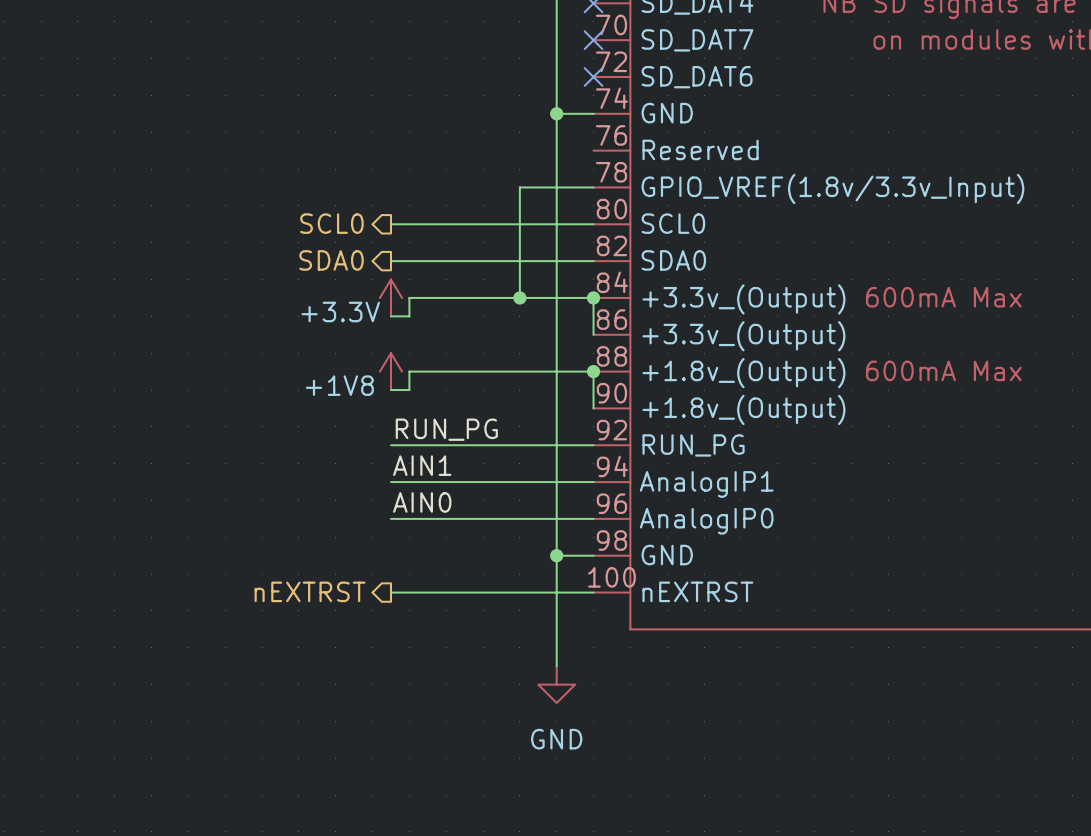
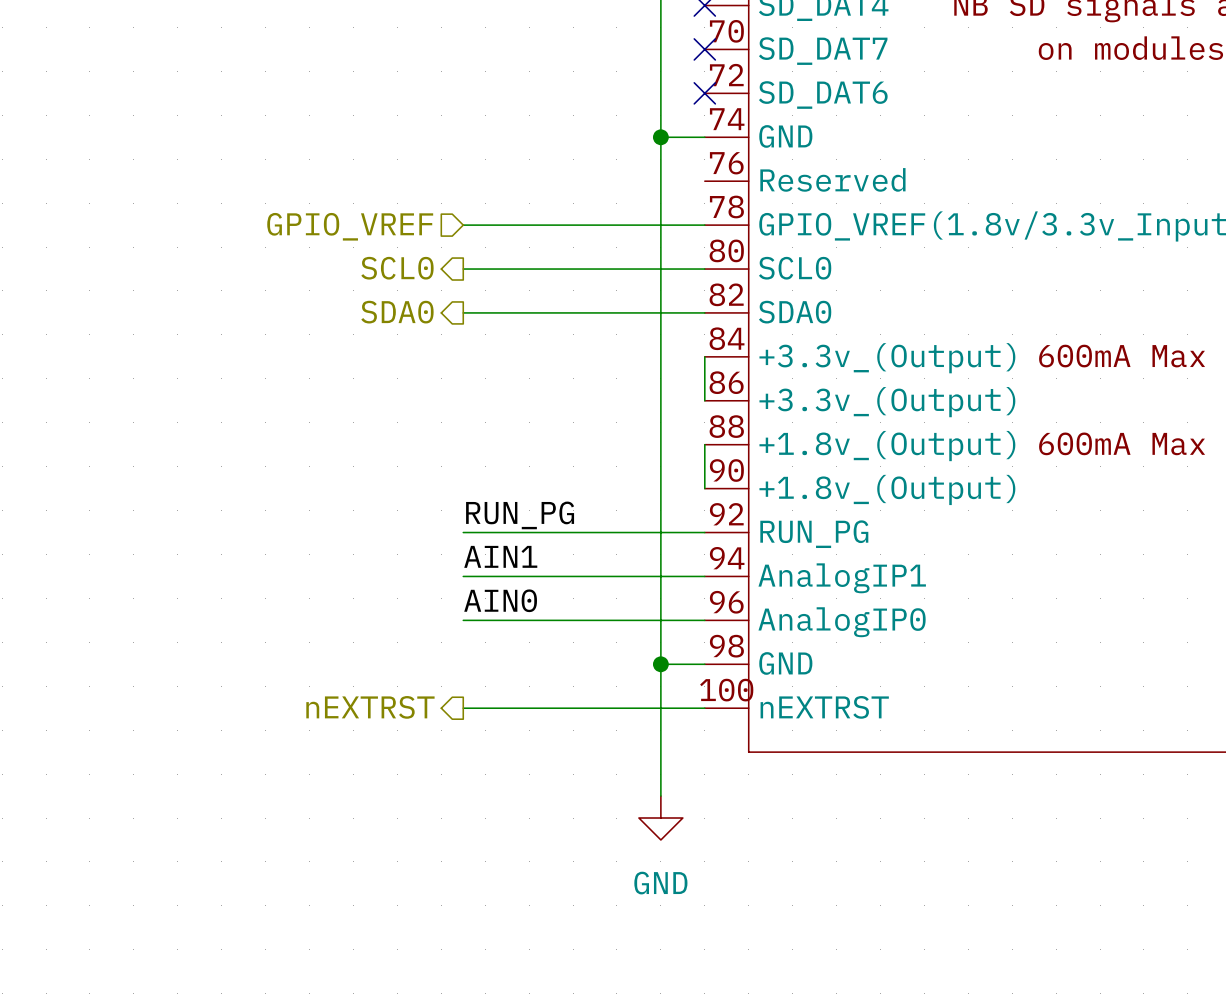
hierarchical label: none -> GPIO_VREF (350, 226)
wire: (519, 187) (519, 297) -> (616, 225) (463, 225)
power symbol: +3.3V (390, 297) -> none
junction: (519, 297) -> none
wire: (593, 297) (409, 297) (409, 316) (390, 316) -> none
junction: (593, 297) -> none
power symbol: +1V8 (390, 371) -> none
wire: (593, 371) (409, 371) (409, 390) (390, 390) -> none
junction: (593, 371) -> none

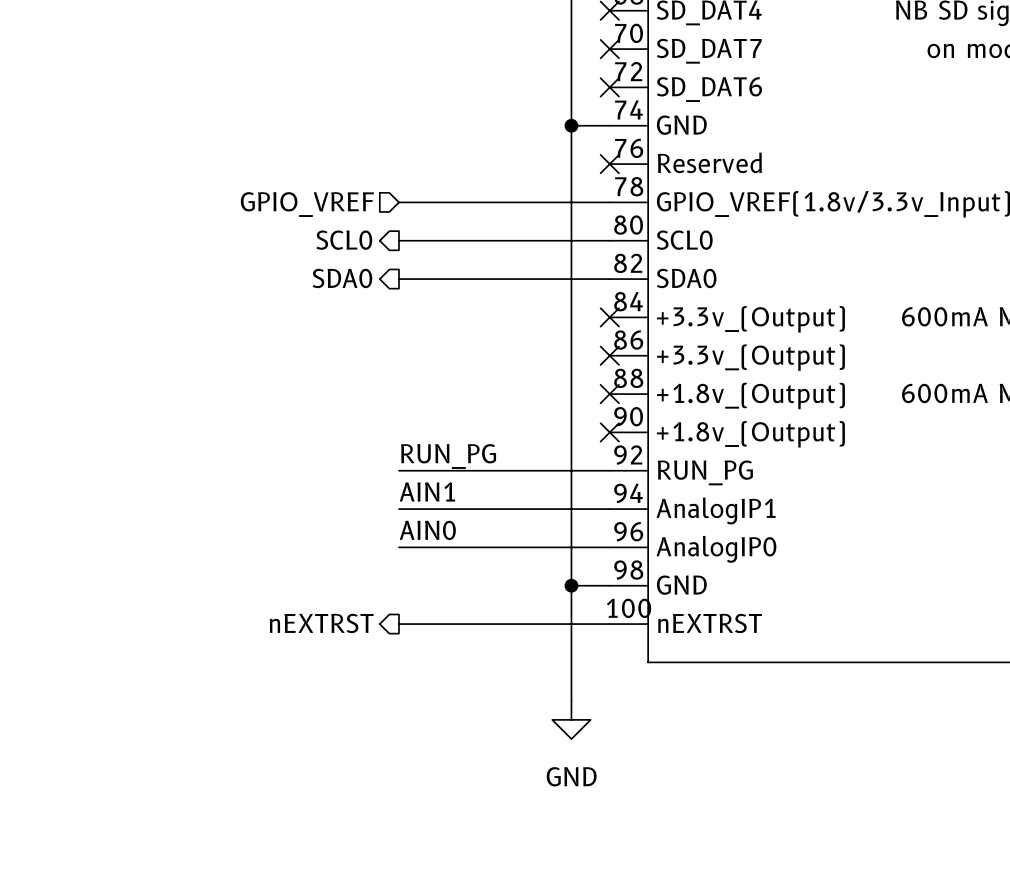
no-connect mark: none -> (609, 164)
wire: (704, 356) (704, 400) -> none
no-connect mark: none -> (609, 317)
no-connect mark: none -> (609, 355)
wire: (704, 444) (704, 488) -> none
no-connect mark: none -> (609, 394)
no-connect mark: none -> (609, 432)

